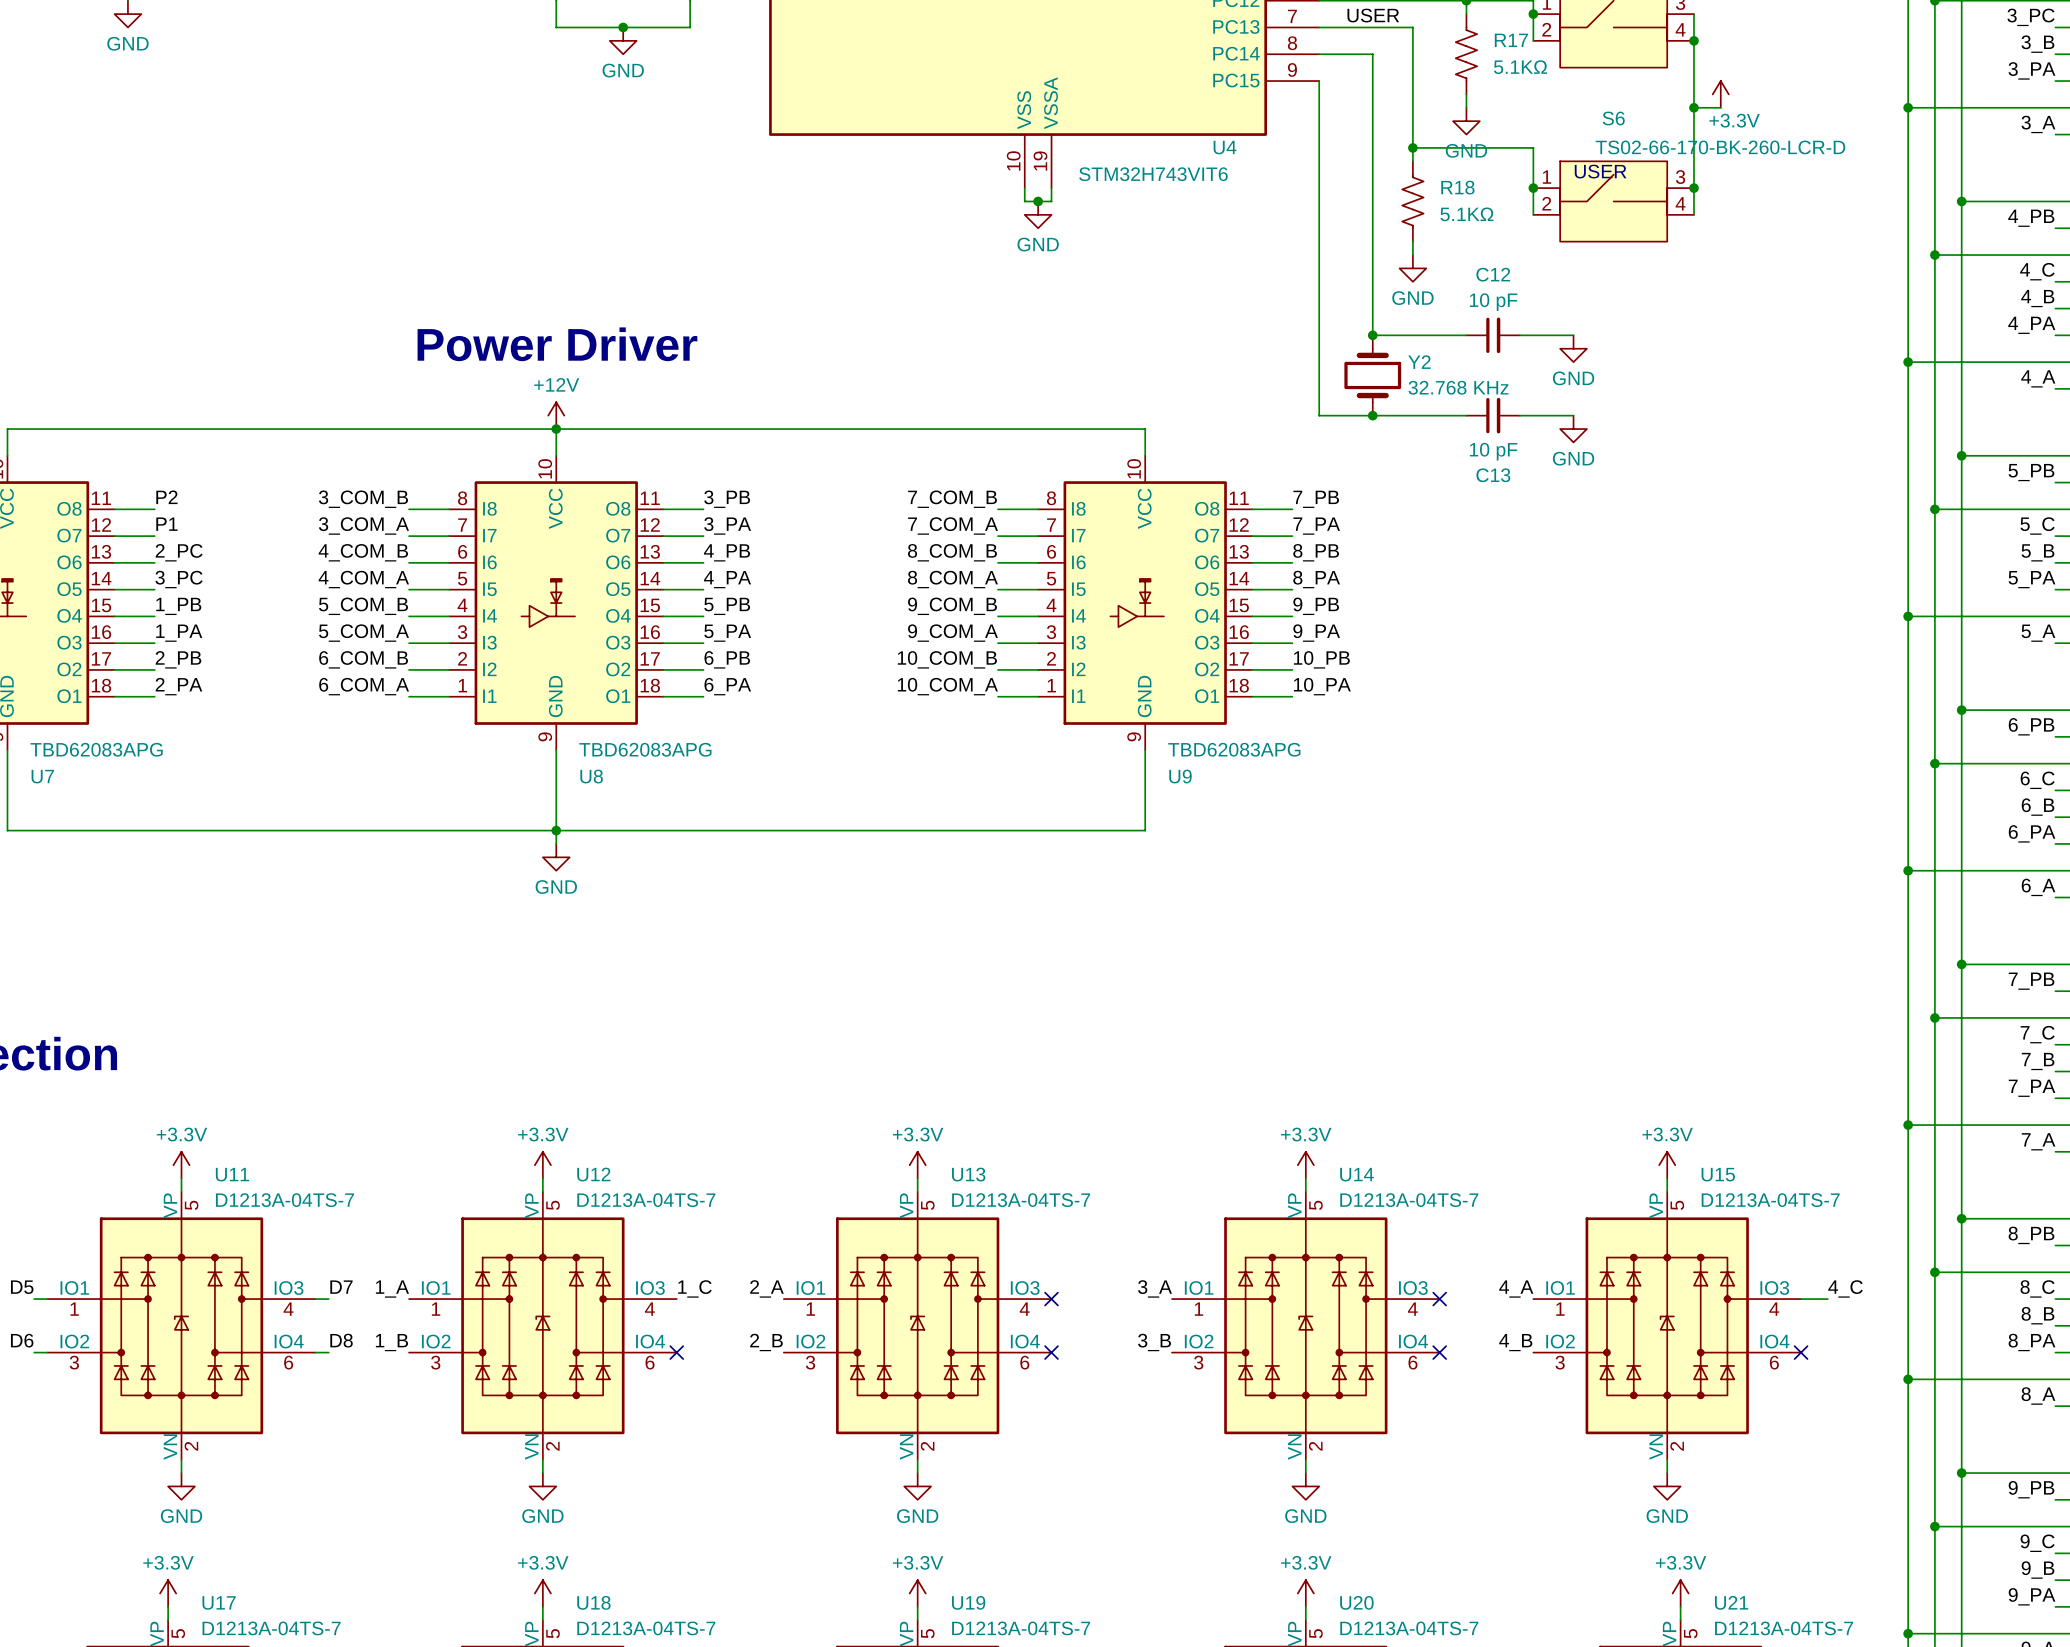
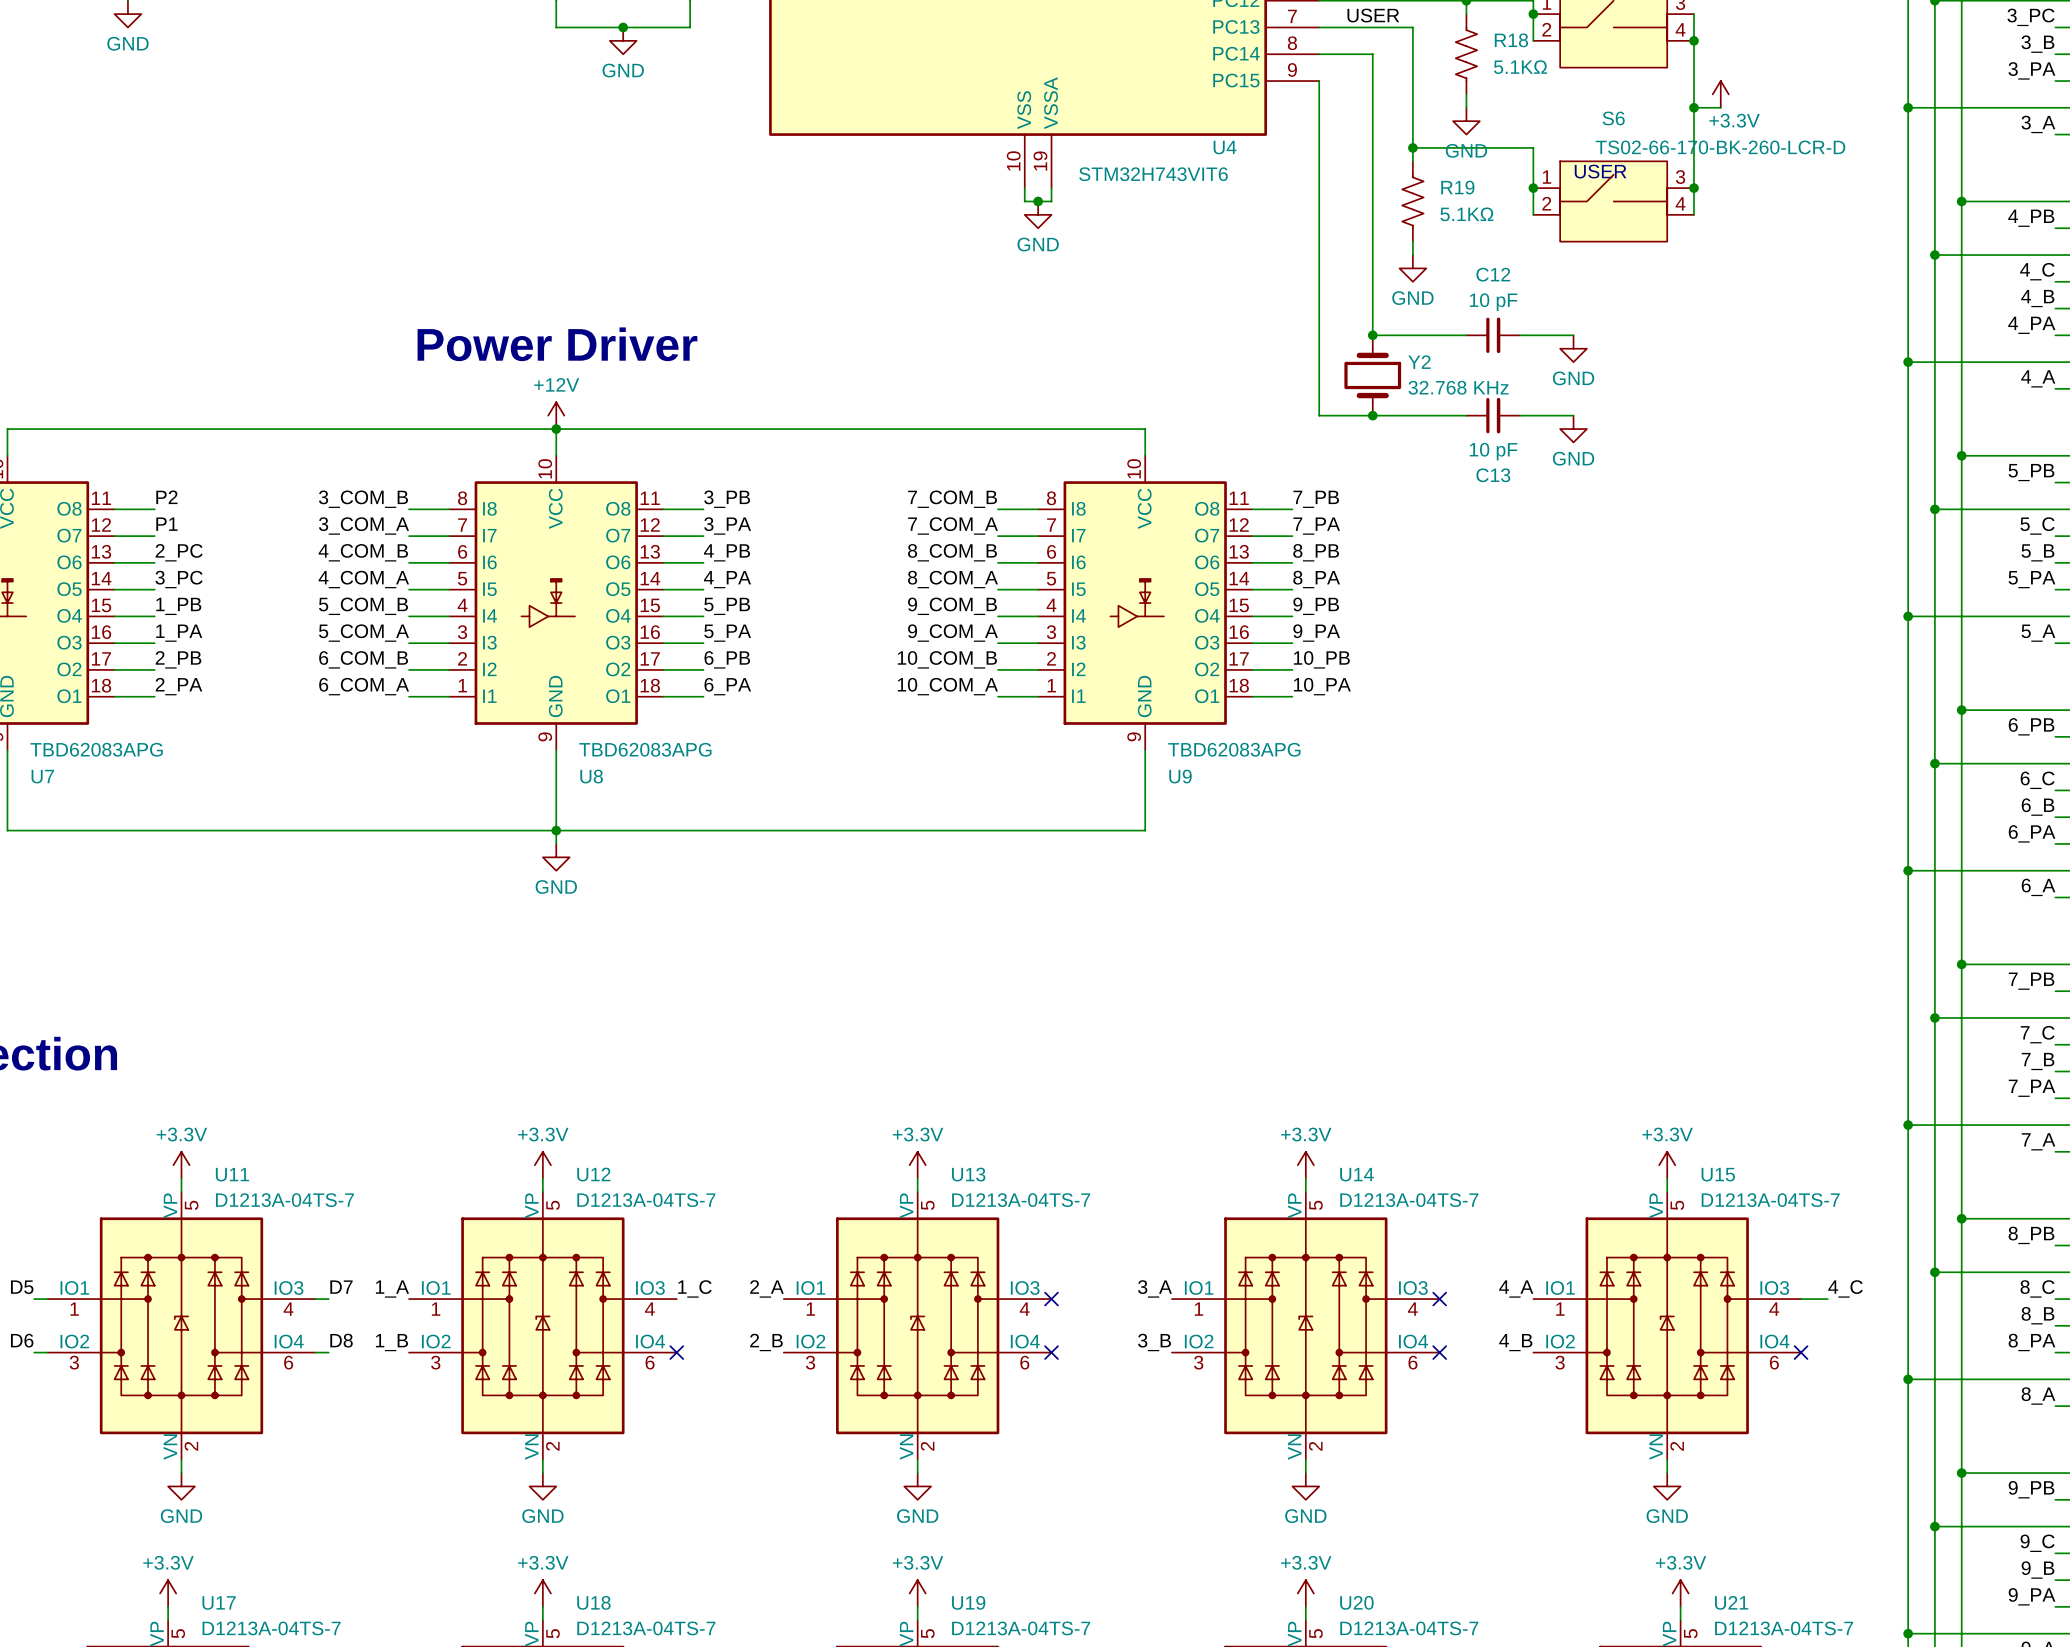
R17 name: R17 (1511, 40) -> R18 (1511, 40)
R18 name: R18 (1457, 187) -> R19 (1457, 187)

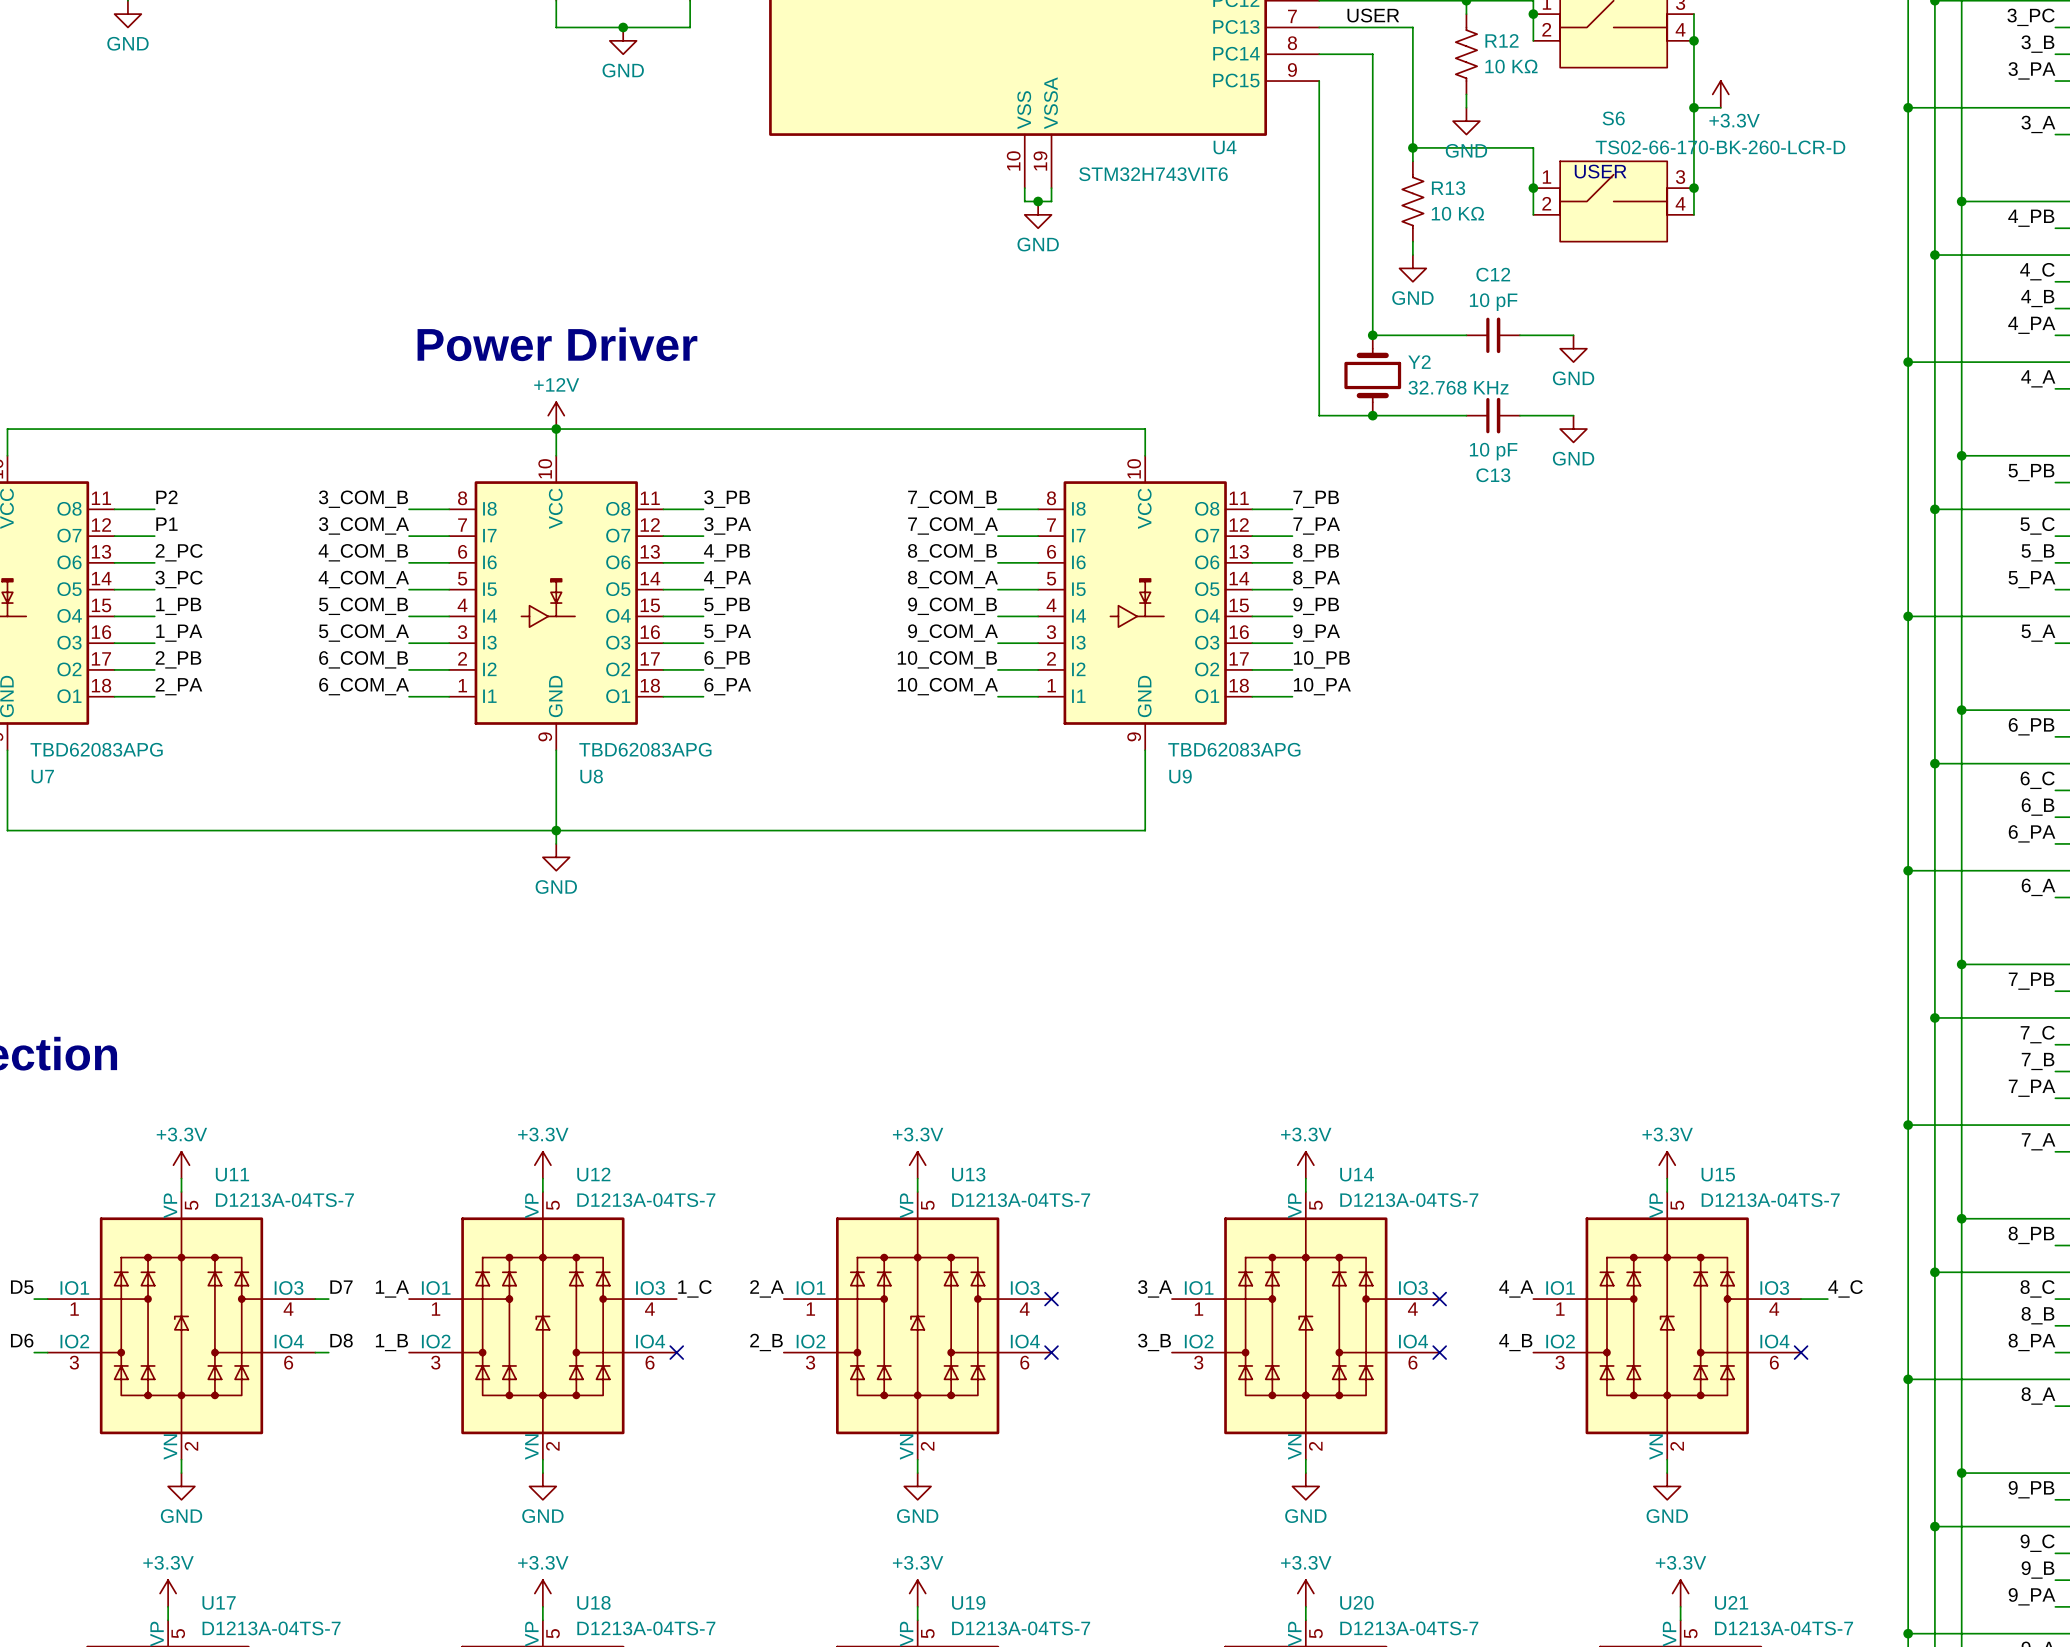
R18 name: R18 (1511, 40) -> R12 (1502, 40)
R18 value: 5.1KΩ (1520, 67) -> 10 KΩ (1511, 66)
R19 name: R19 (1457, 187) -> R13 (1448, 188)
R19 value: 5.1KΩ (1466, 214) -> 10 KΩ (1457, 213)

